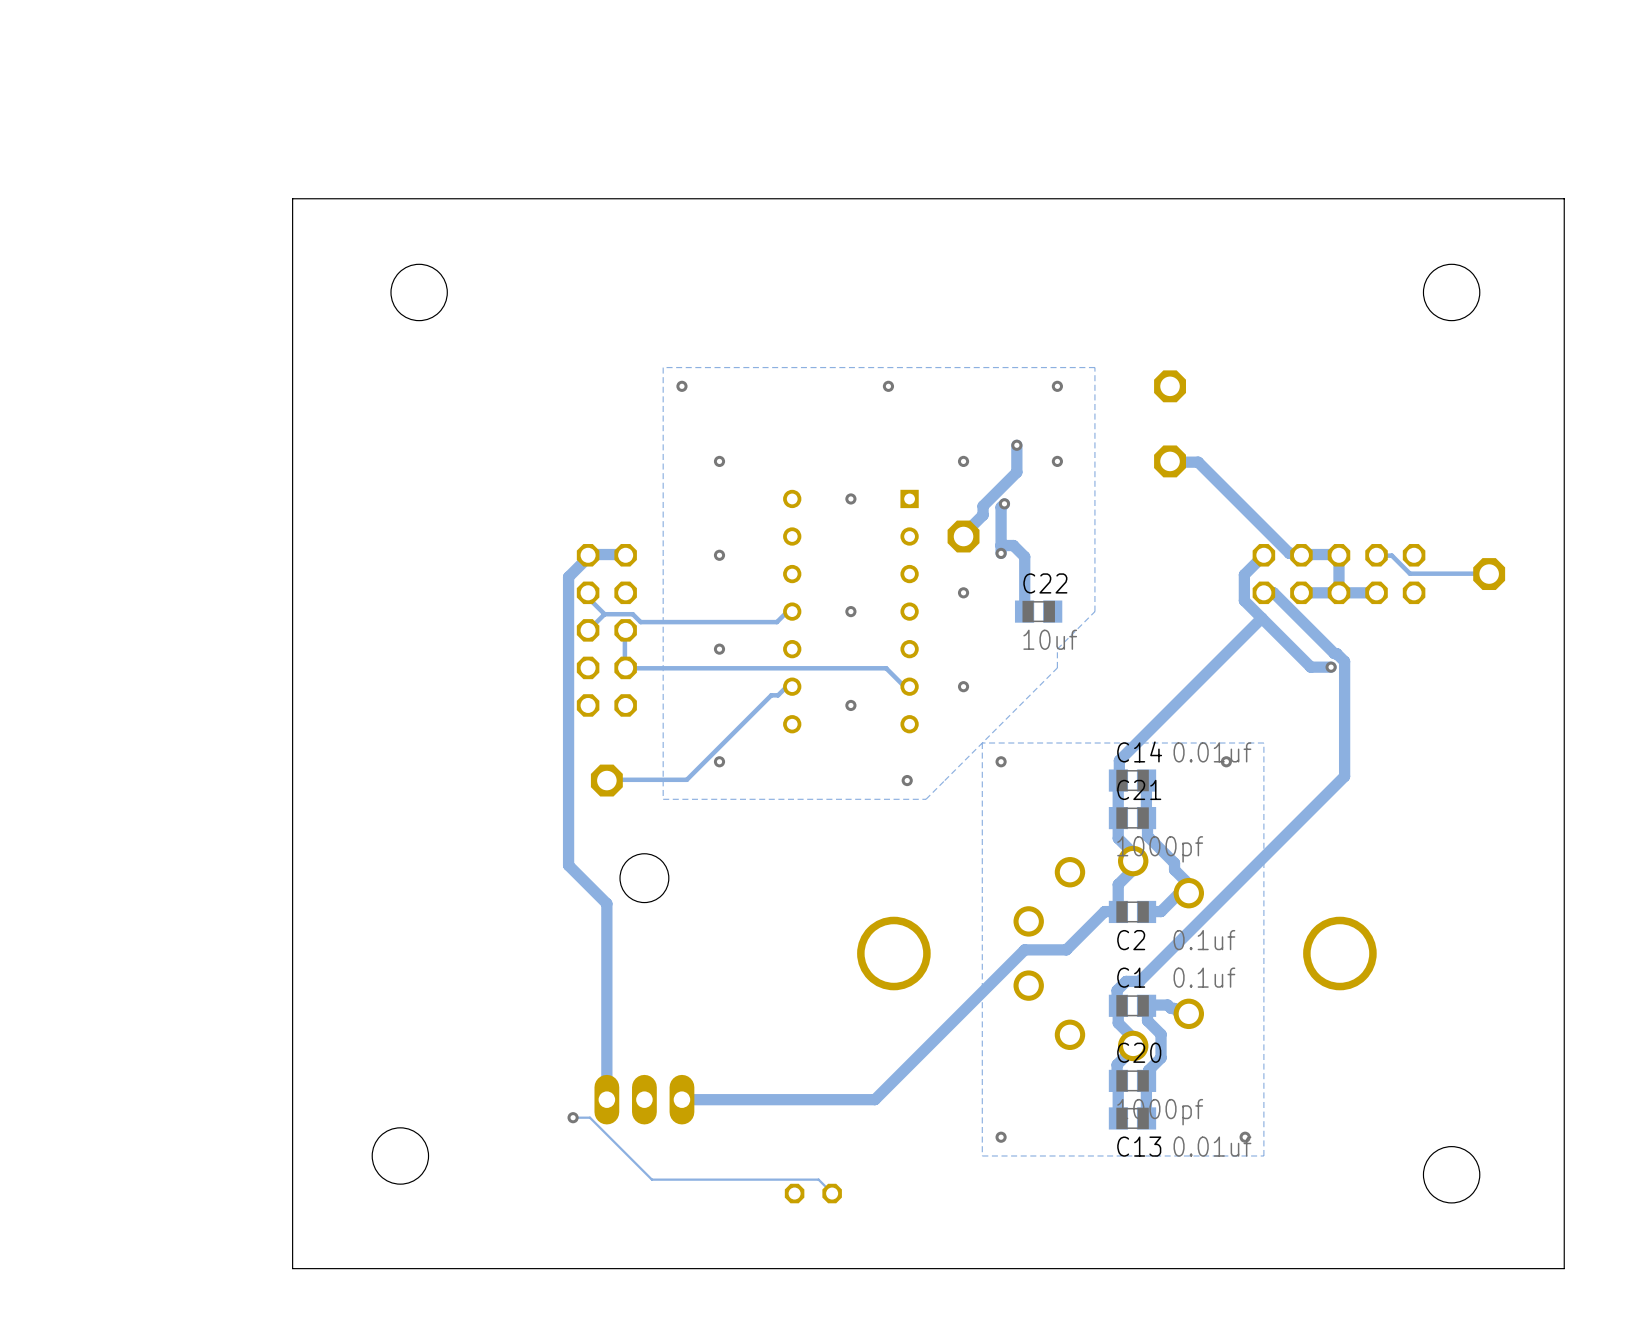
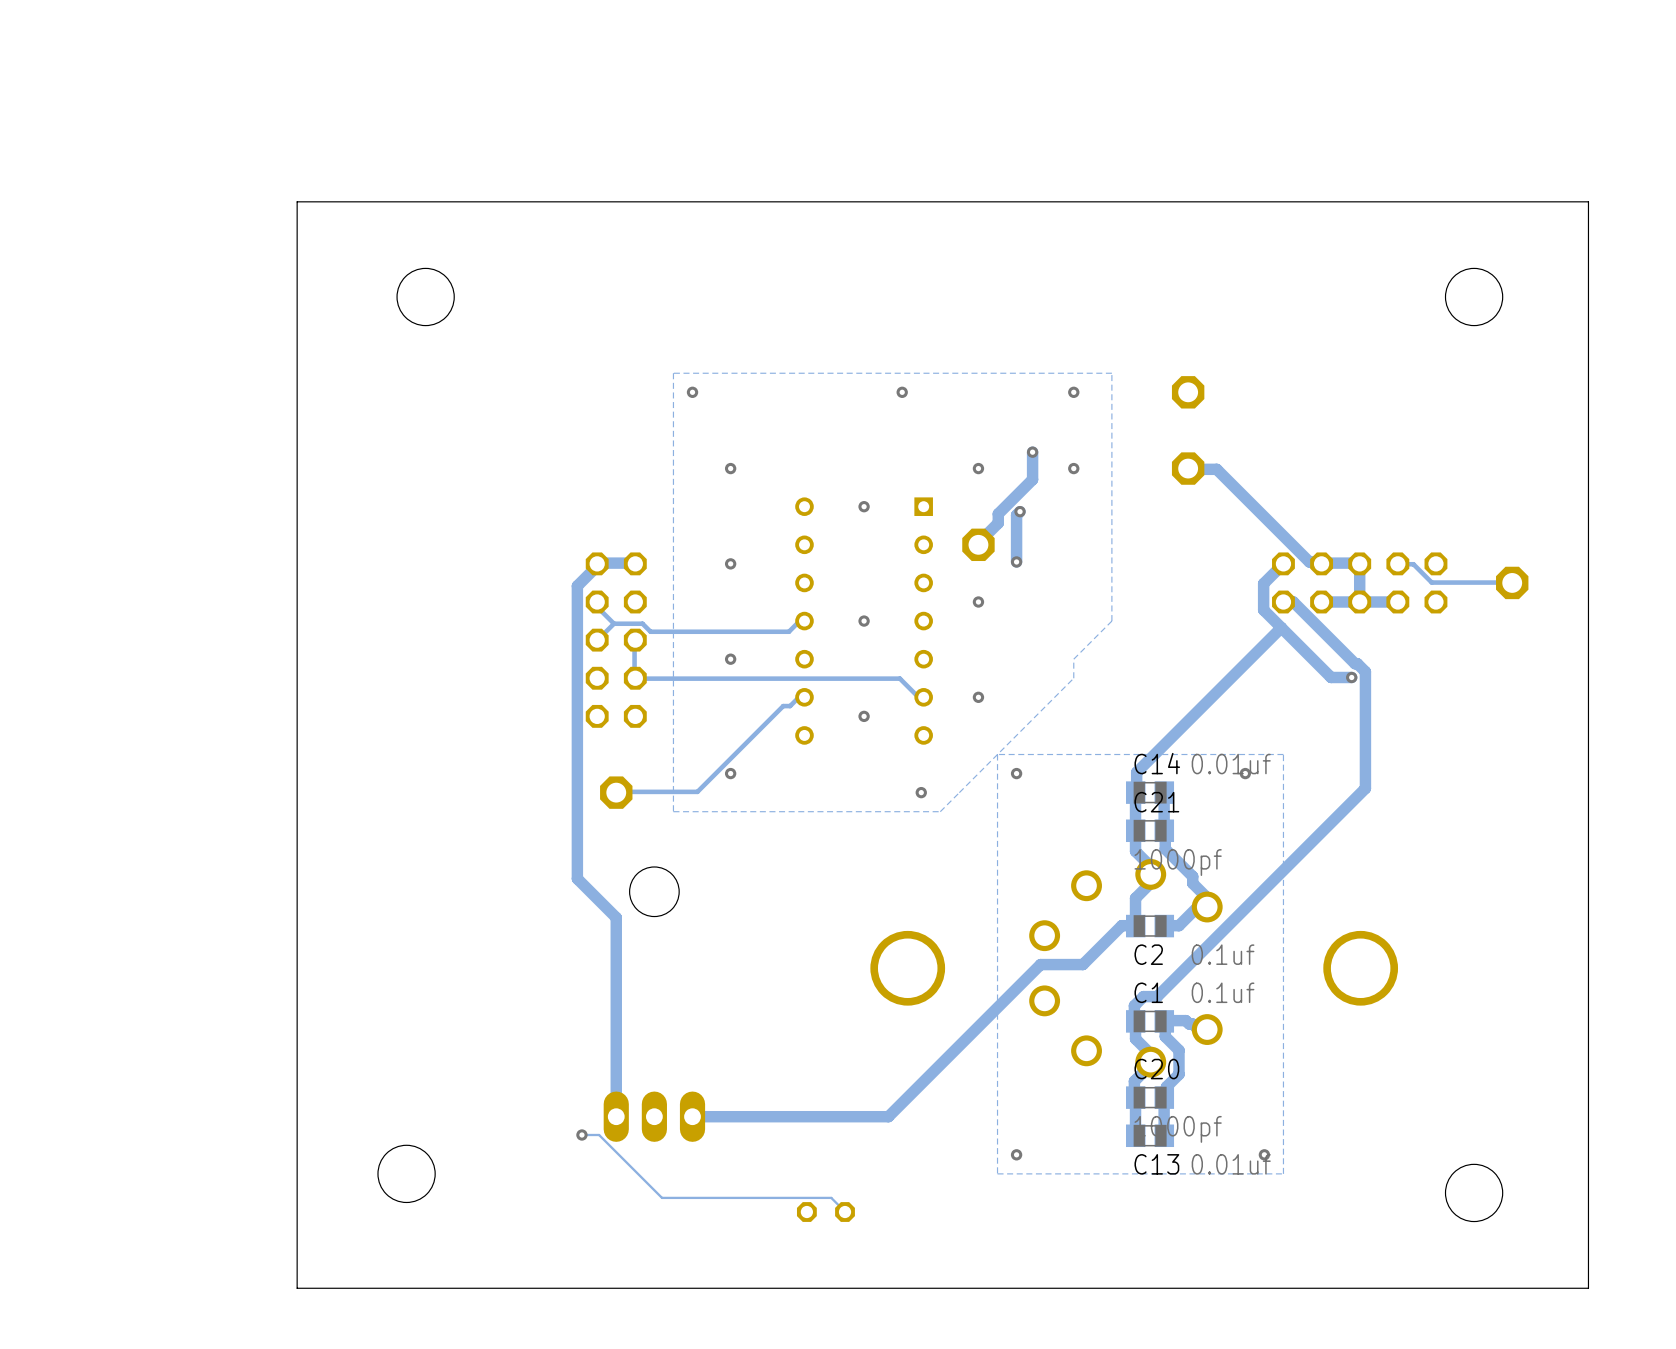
track: (1001, 545) (1013, 545) (1024, 556) (1024, 611) -> none
C22: 10uf (1038, 611) -> none

